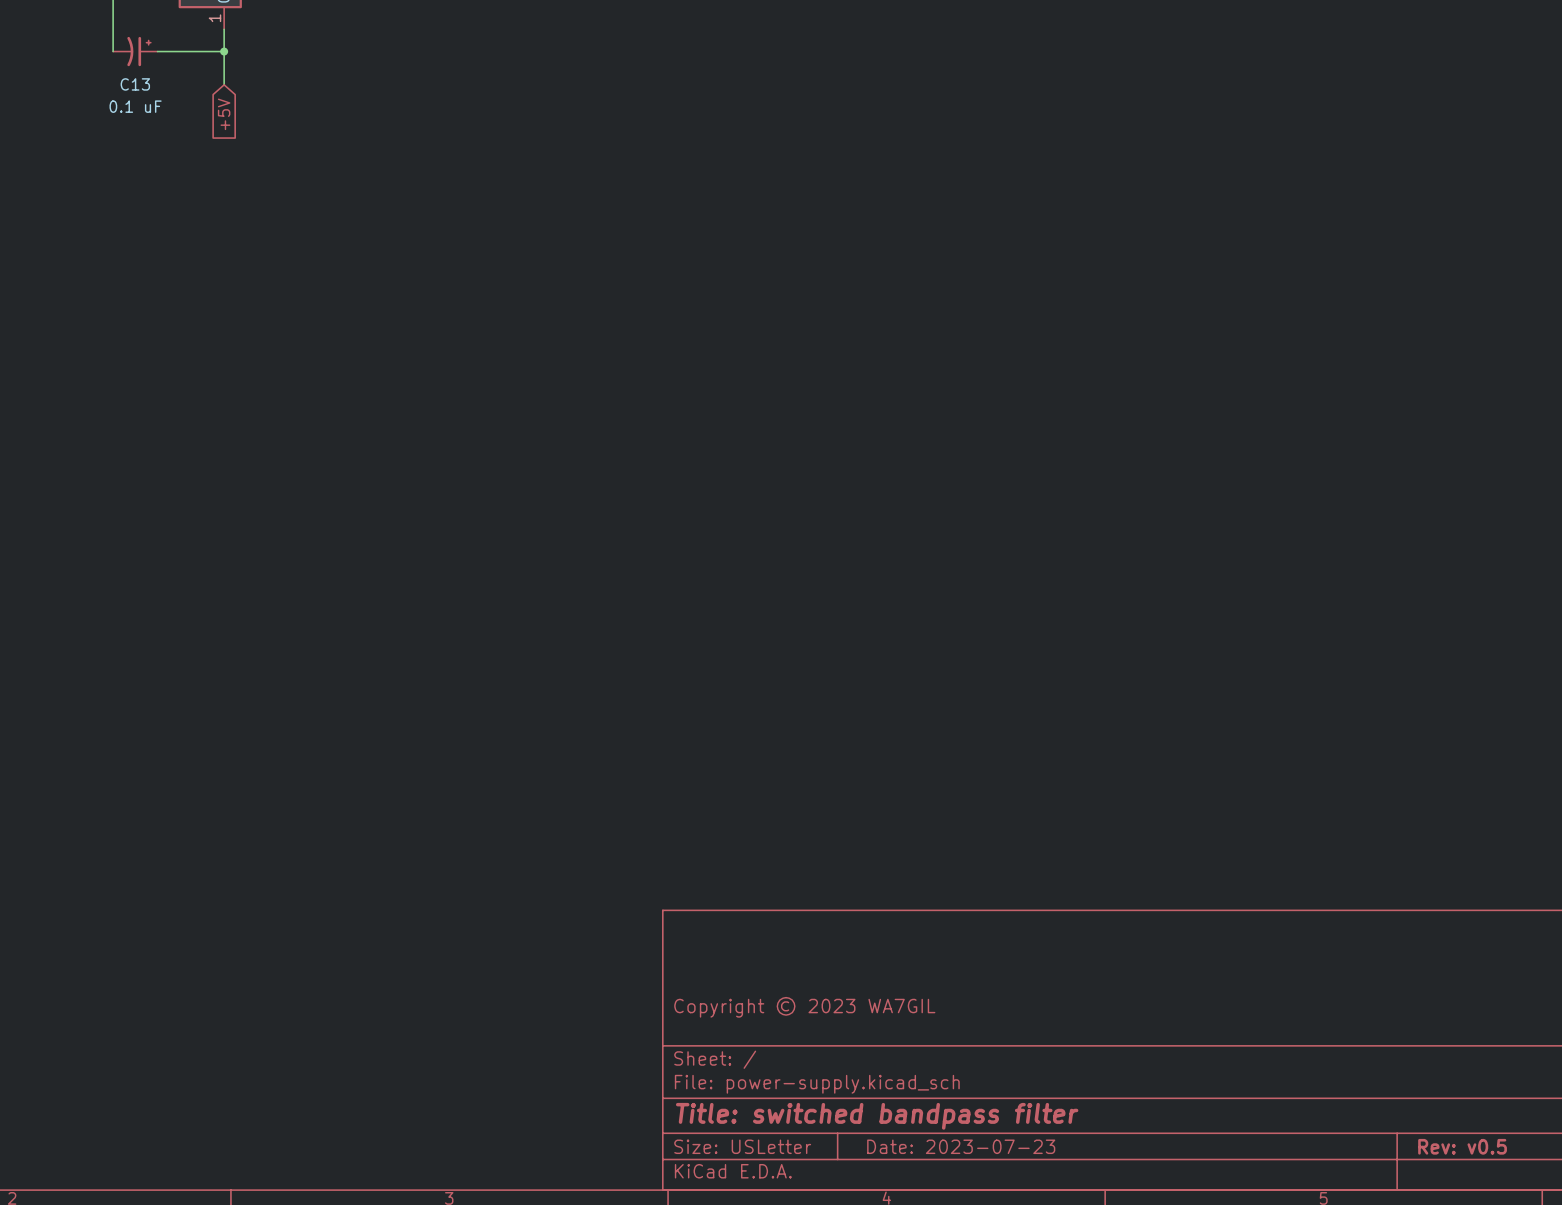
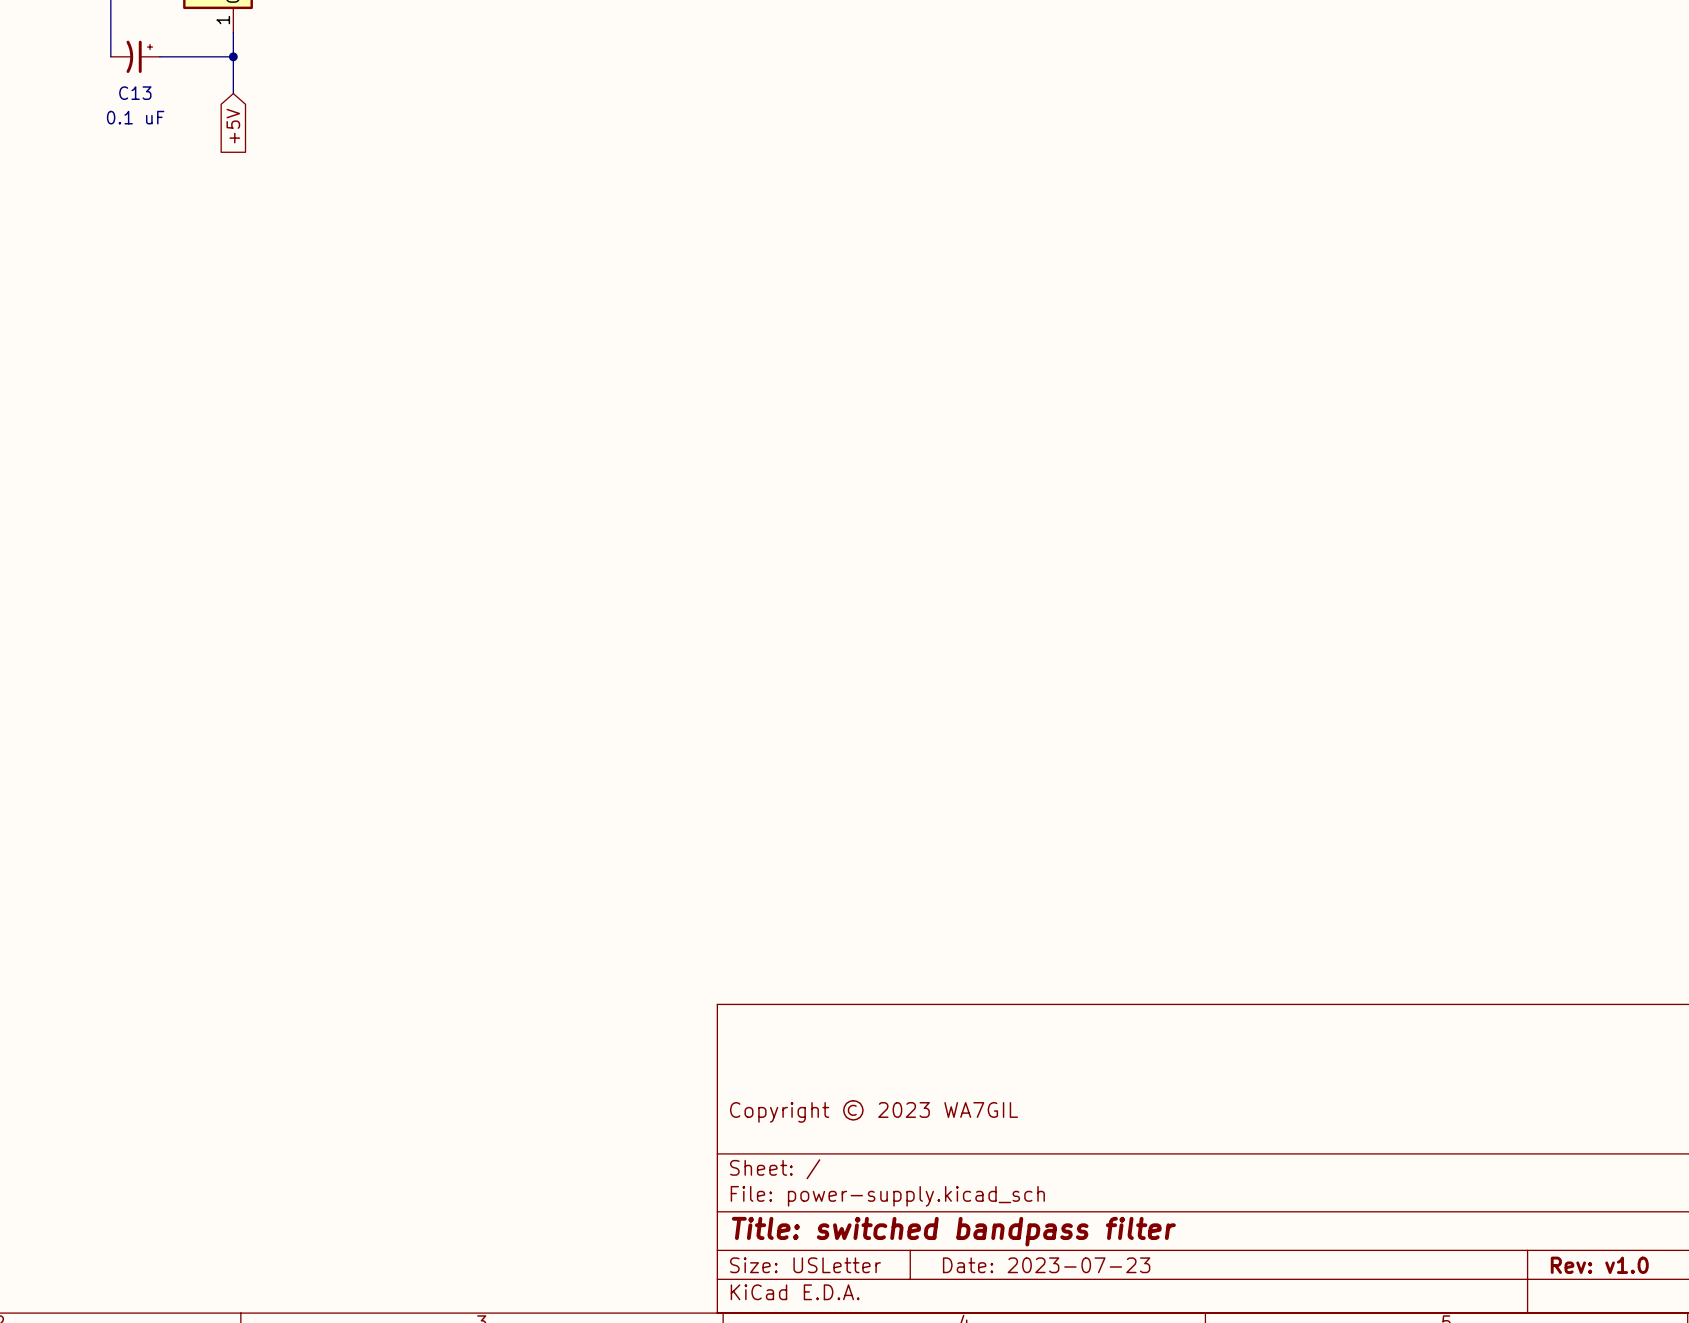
title block: Rev: v0.5 (1462, 1146) -> Rev: v1.0 (1599, 1265)

